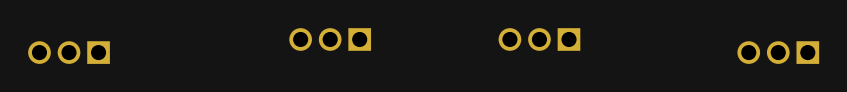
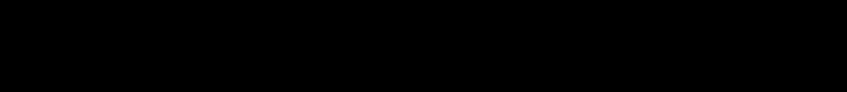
part: (330, 39) -> none
part: (539, 39) -> none
part: (69, 52) -> none
part: (778, 52) -> none

